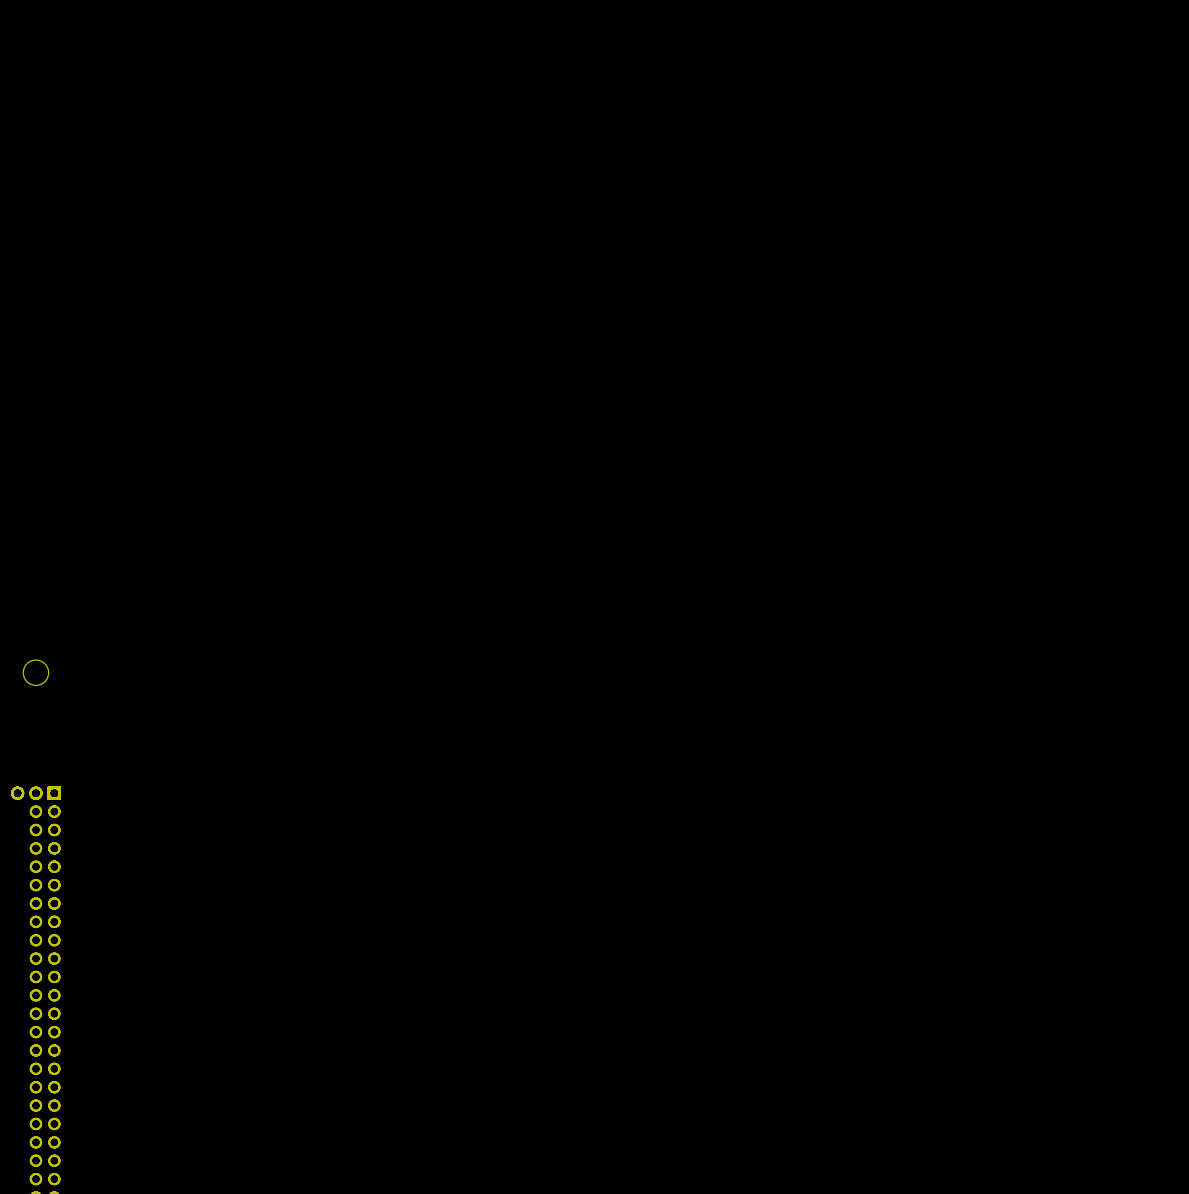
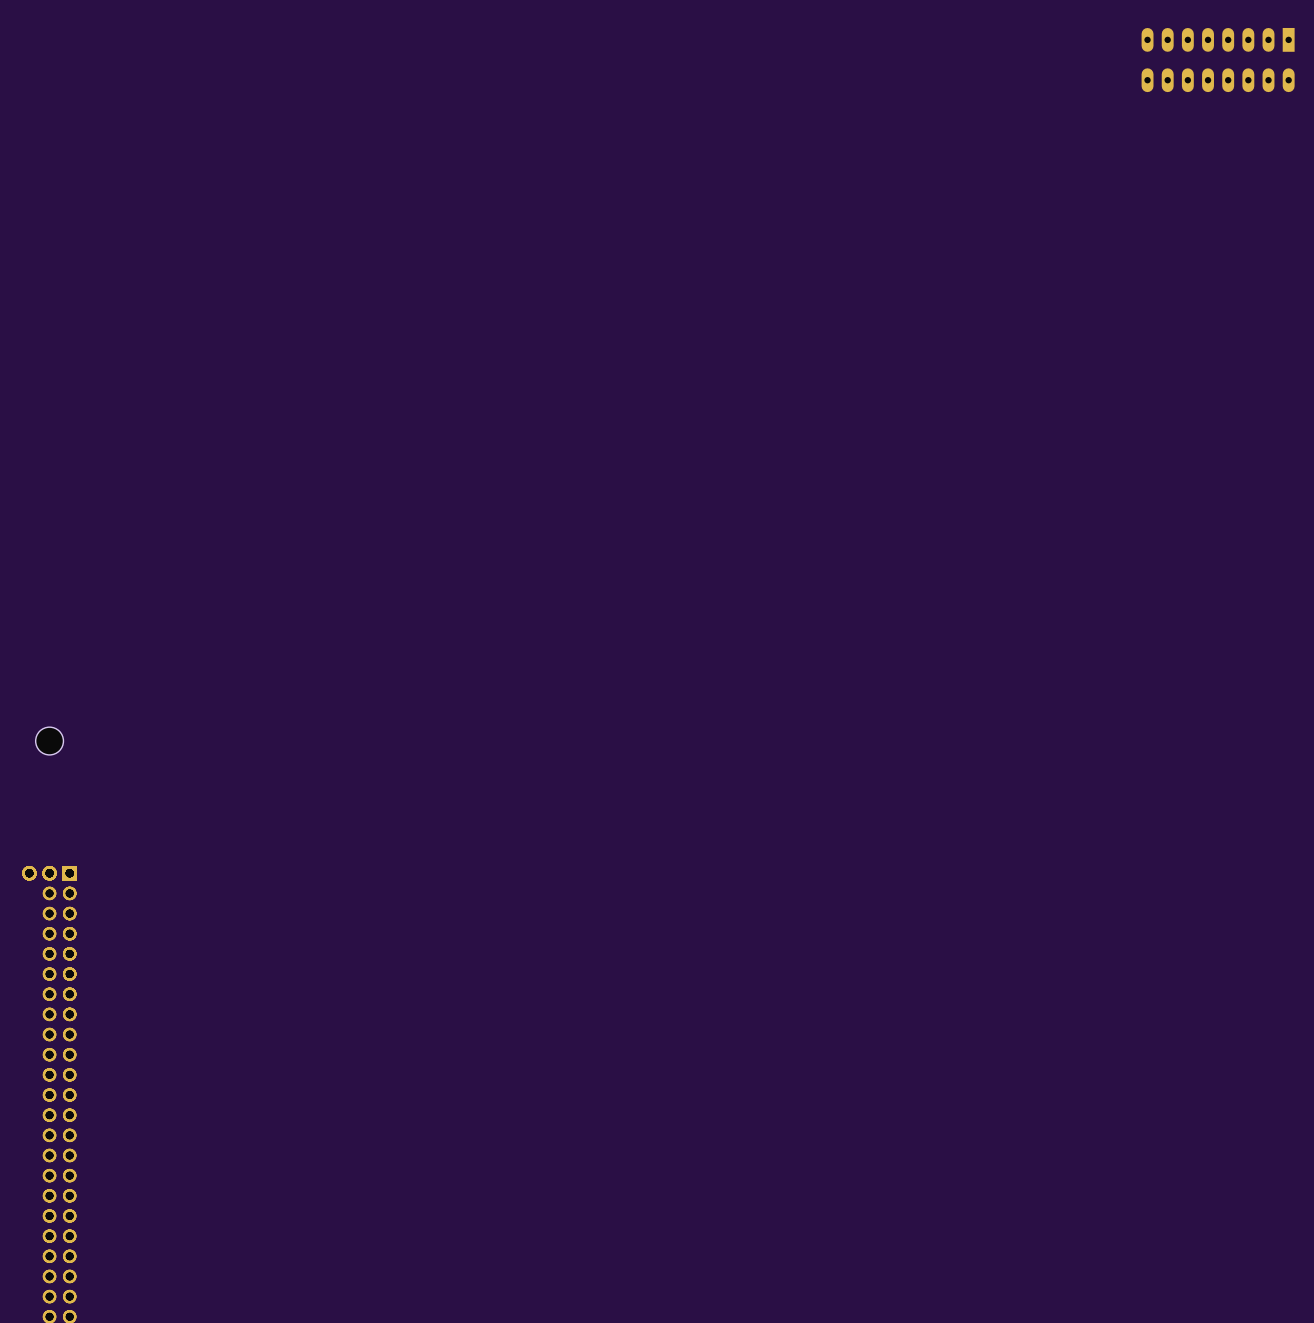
part: none -> (1218, 60)

